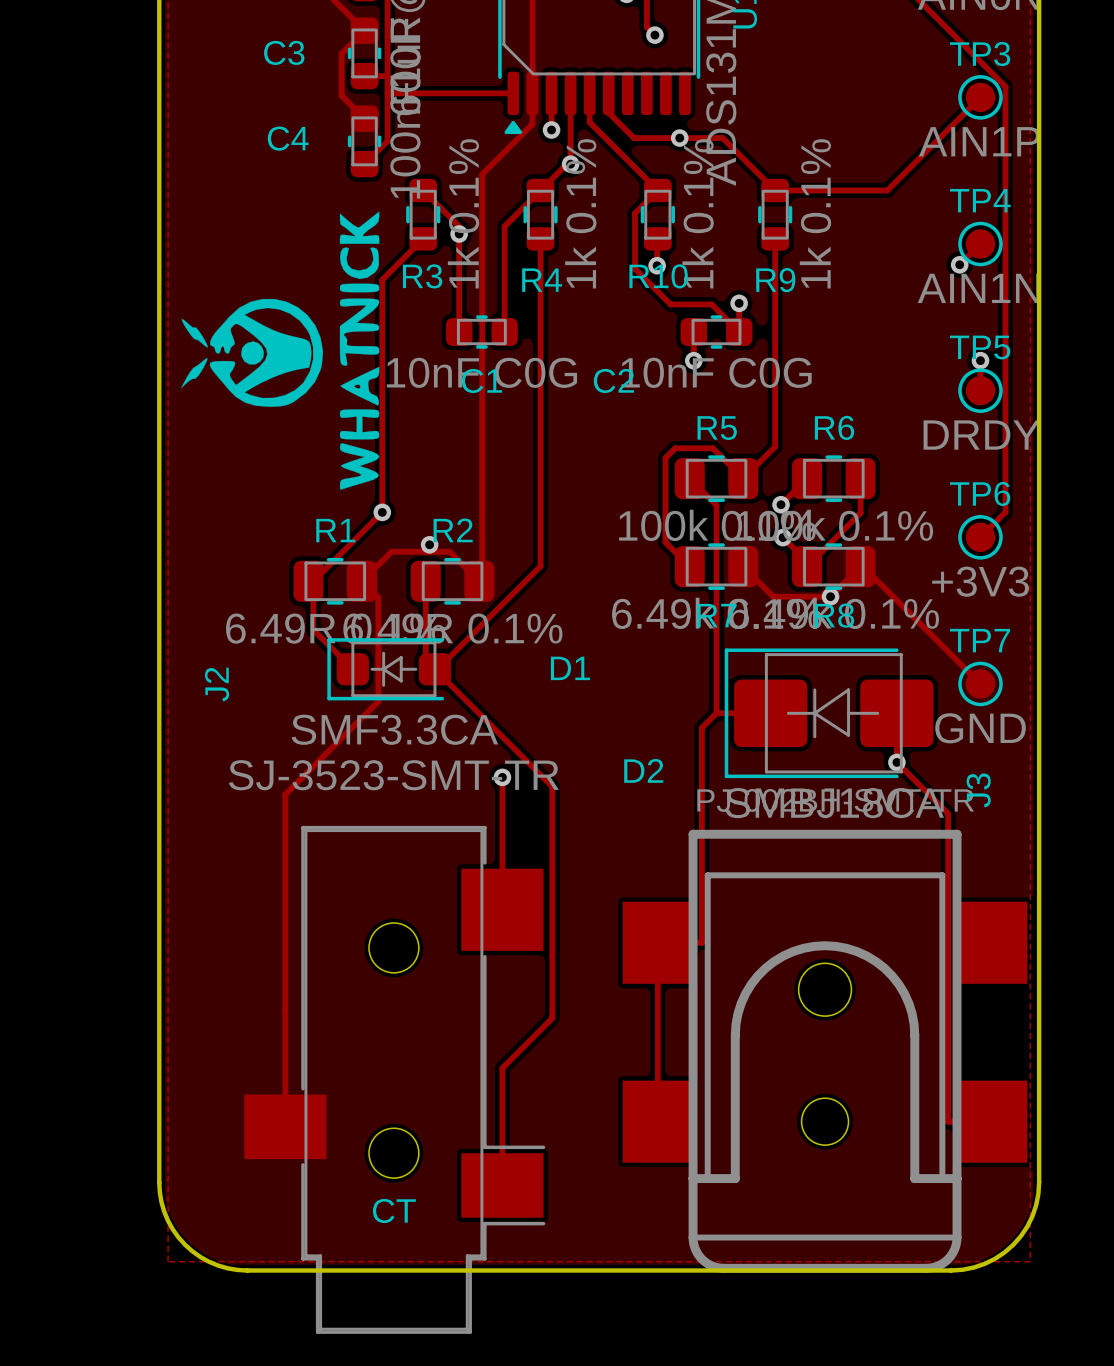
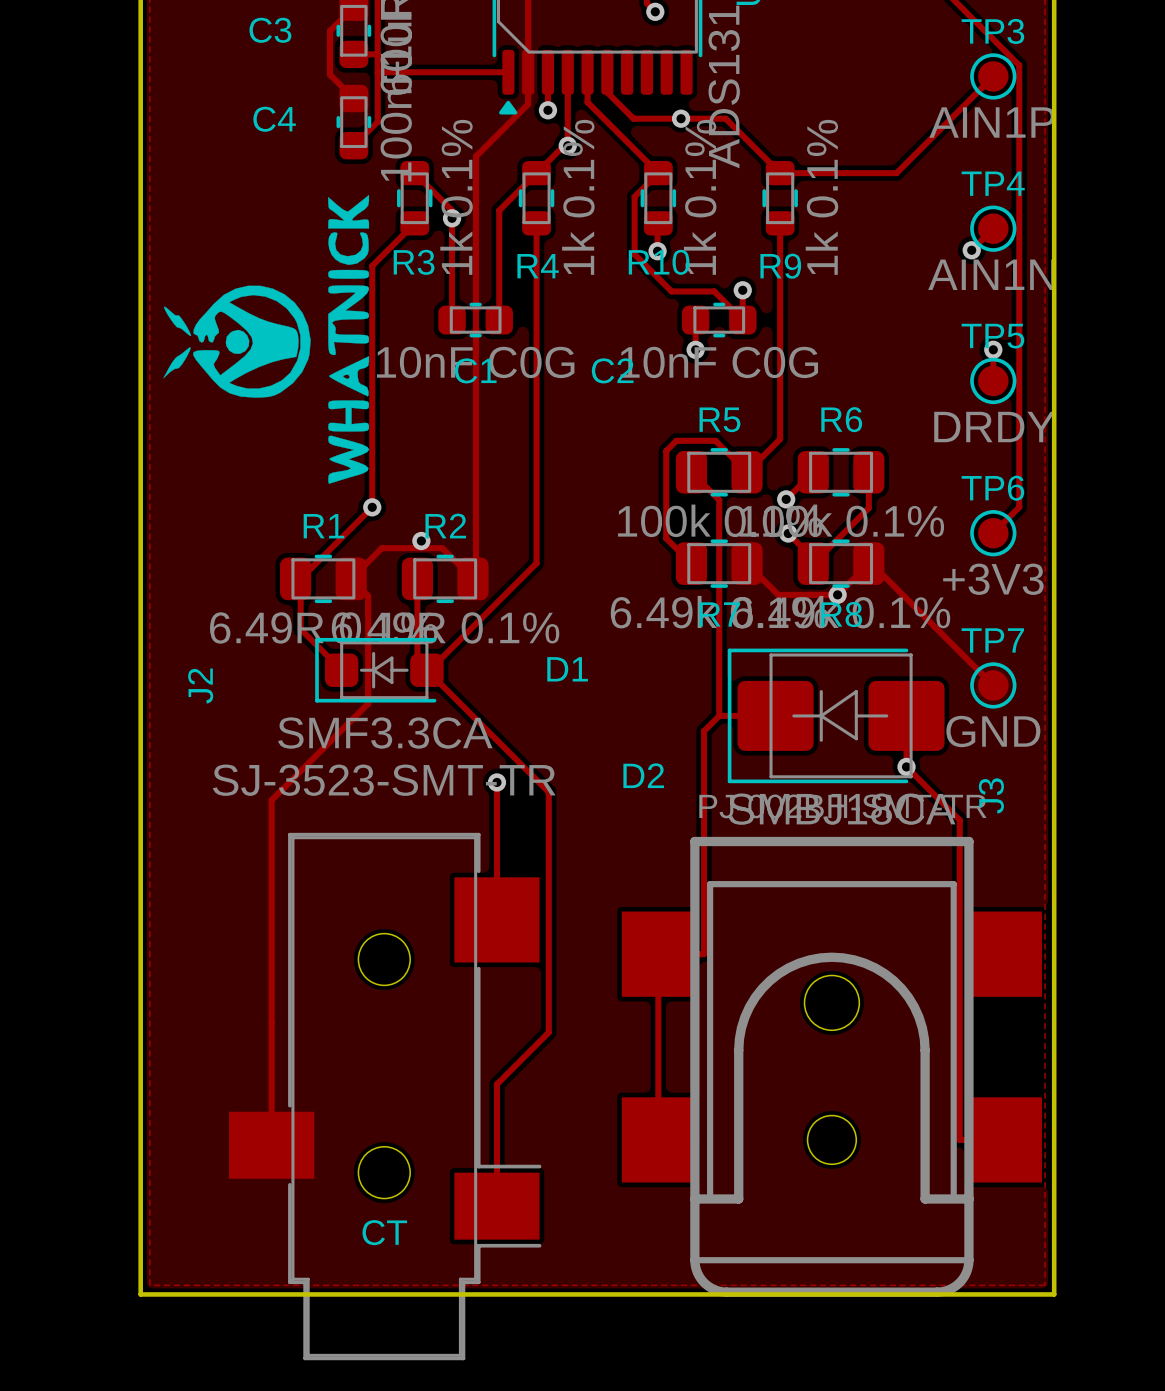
board edge: (159, 1182) (161, 1202) (168, 1220) (185, 1244) (200, 1257) (218, 1265) (247, 1270) -> (140, 1203) (140, 1294) (232, 1294)
board edge: (1039, 1182) (1038, 1194) (1032, 1216) (1027, 1226) (1013, 1244) (995, 1258) (984, 1263) (973, 1267) (951, 1270) -> (1054, 1203) (1054, 1294) (962, 1294)

